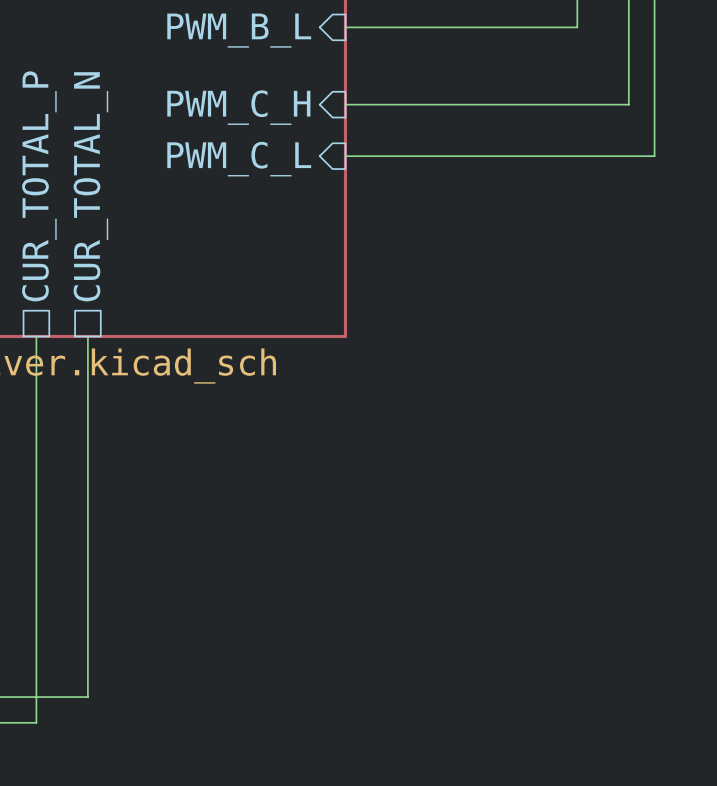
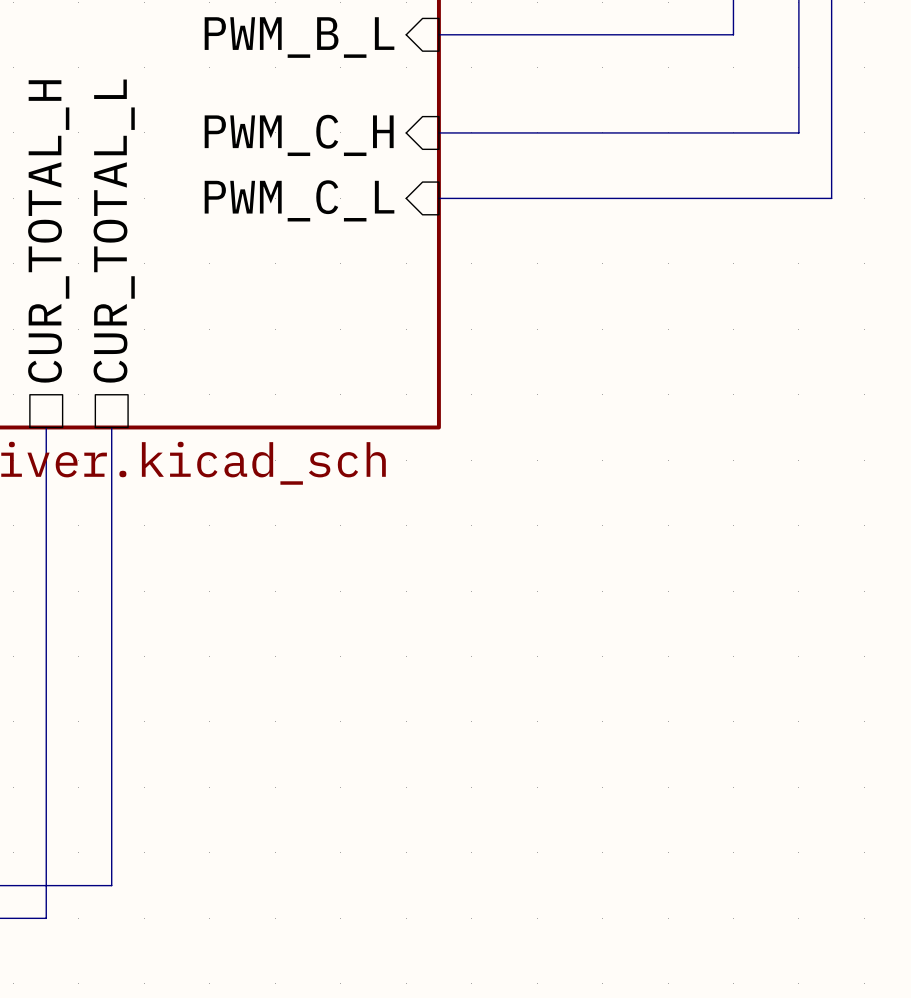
sheet pin: CUR_TOTAL_P (39, 186) -> CUR_TOTAL_H (48, 231)
sheet pin: CUR_TOTAL_N (90, 186) -> CUR_TOTAL_L (114, 231)

